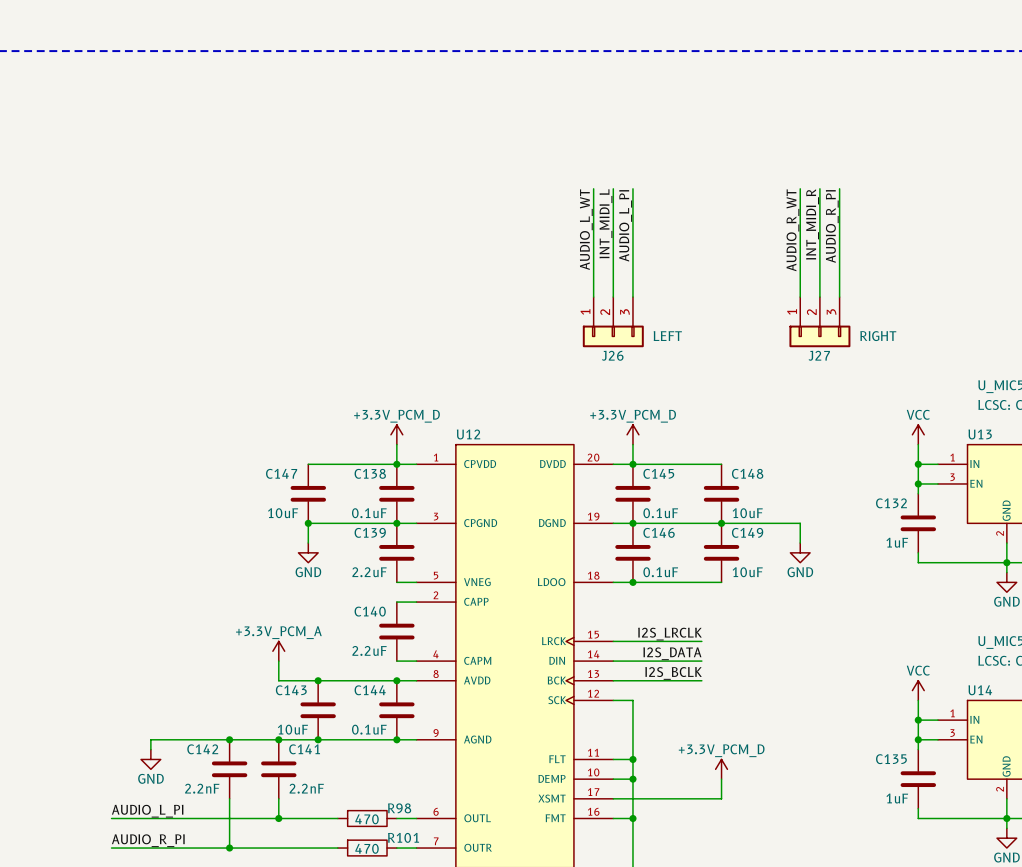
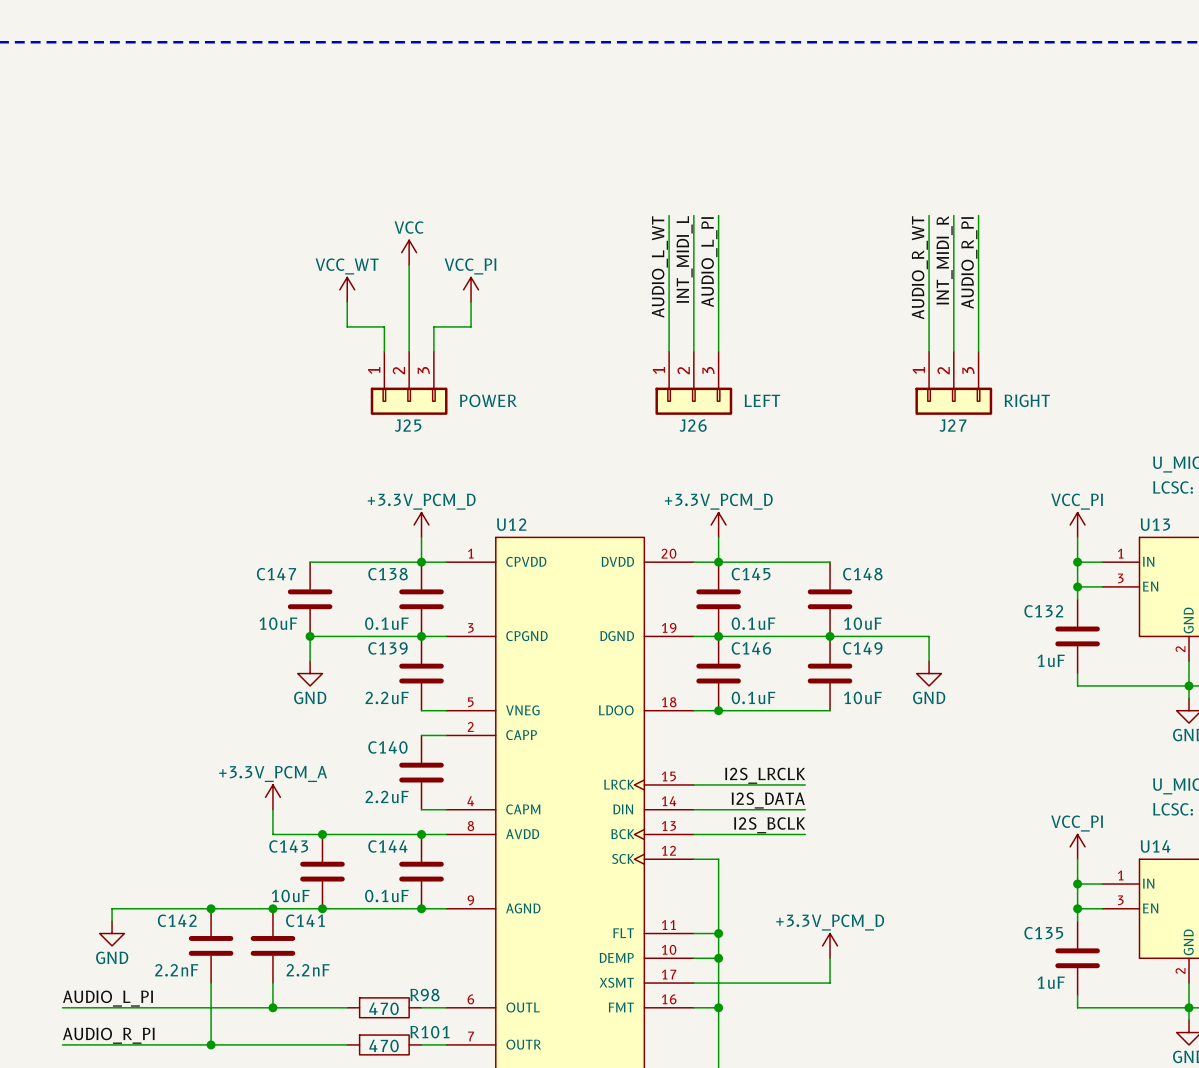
power symbol: none -> VCC (409, 252)
wire: none -> (409, 265) (409, 351)
power symbol: none -> VCC_WT (347, 289)
power symbol: none -> VCC_PI (471, 289)
wire: none -> (347, 302) (347, 326) (384, 326) (384, 351)
wire: none -> (471, 302) (471, 326) (433, 326) (433, 351)
J25: none -> POWER (409, 383)
power symbol: VCC (918, 434) -> VCC_PI (1077, 525)
power symbol: VCC (918, 690) -> VCC_PI (1077, 846)

